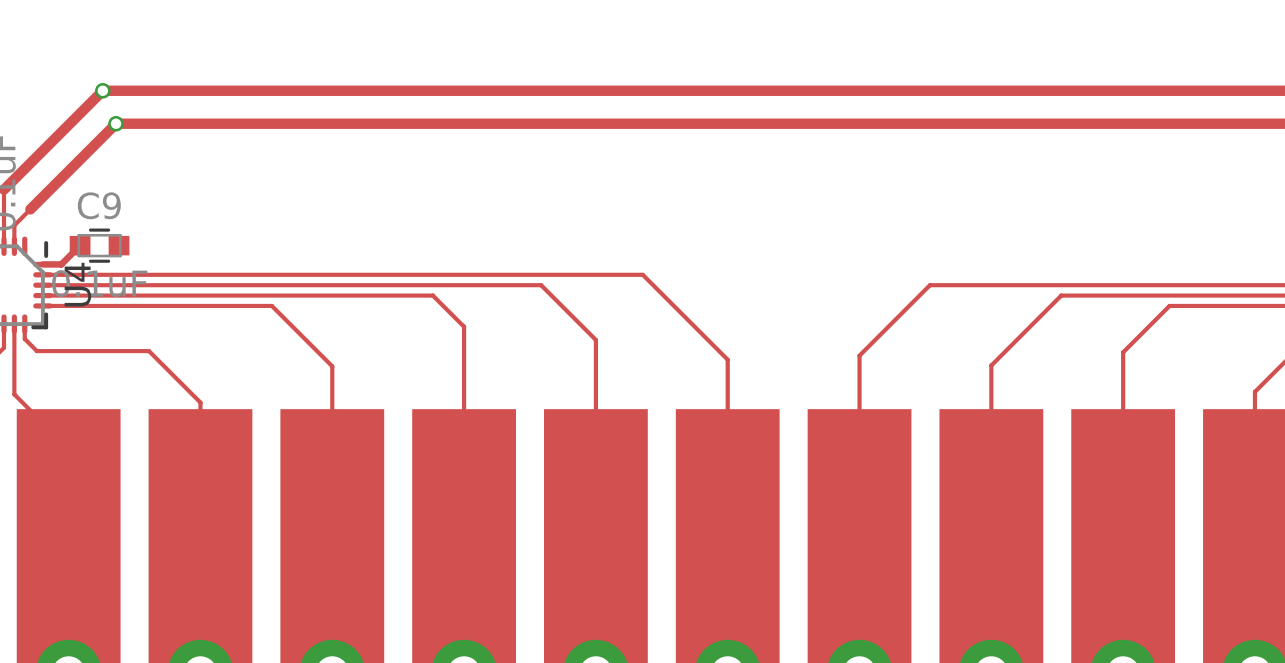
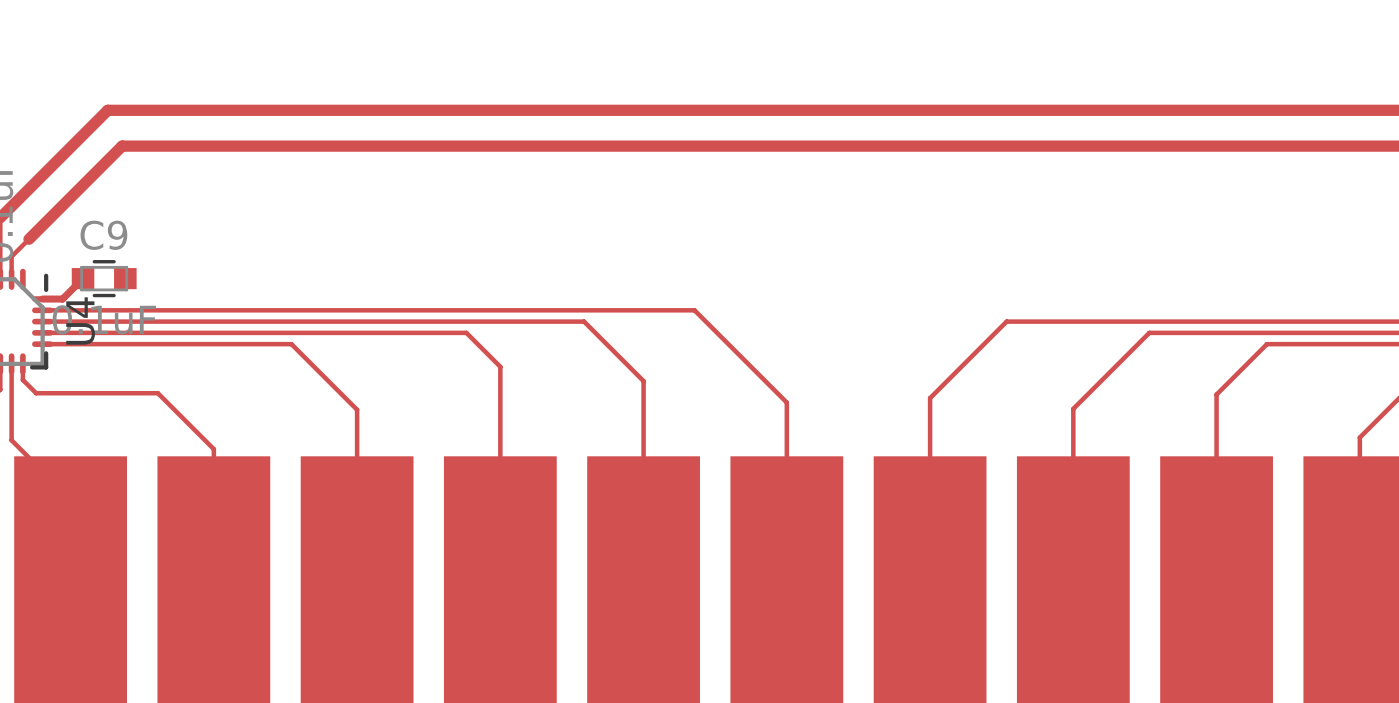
via: (102, 90) -> none
via: (116, 123) -> none

